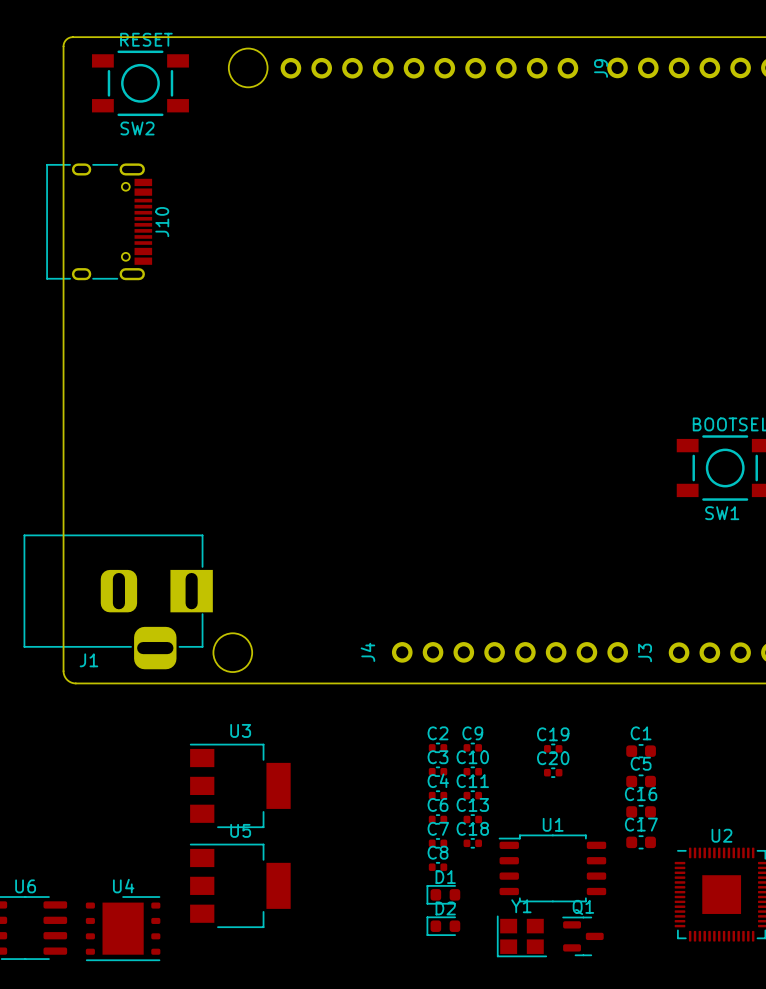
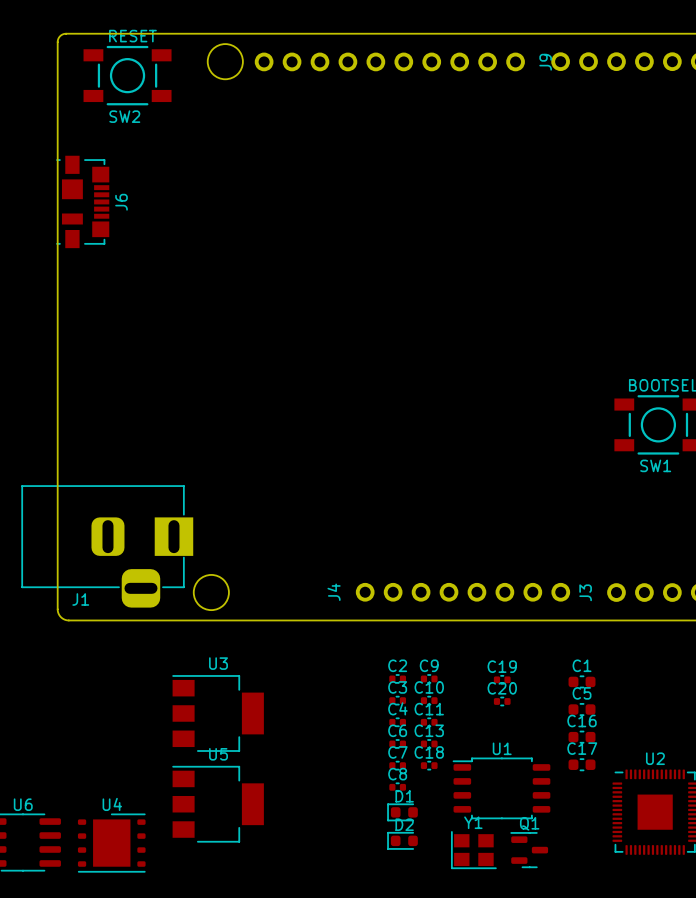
J10: (99, 221) -> none
J6: none -> (82, 201)

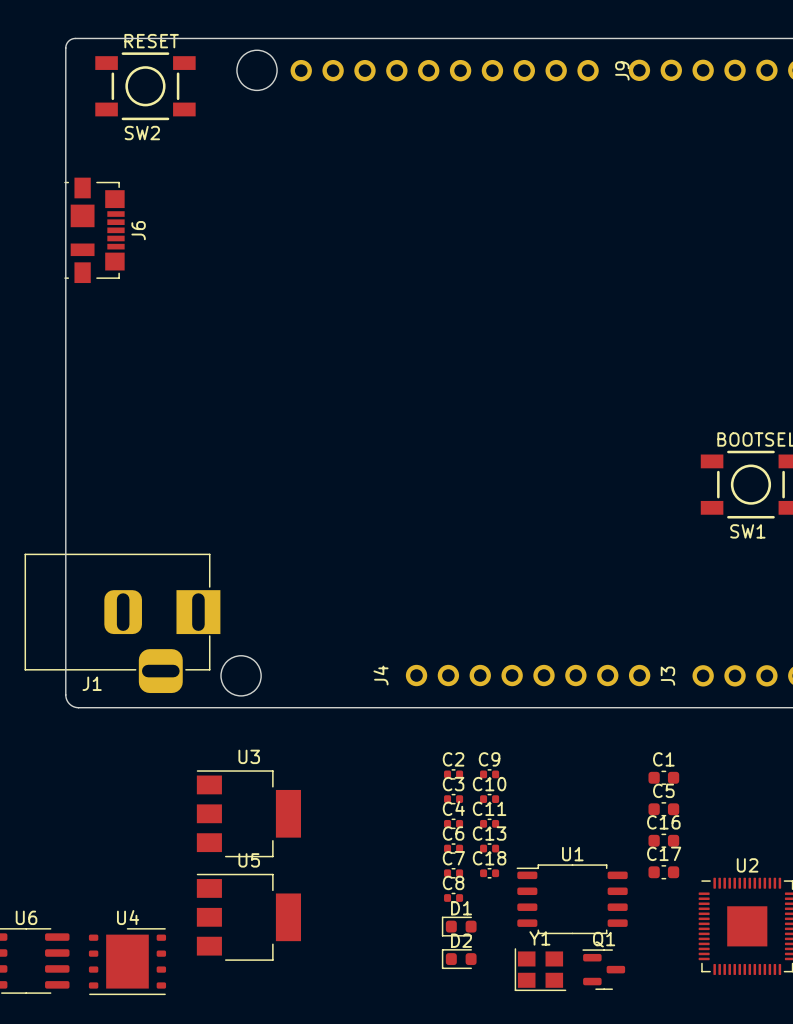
C19: (502, 679) -> none
C20: (502, 701) -> none

